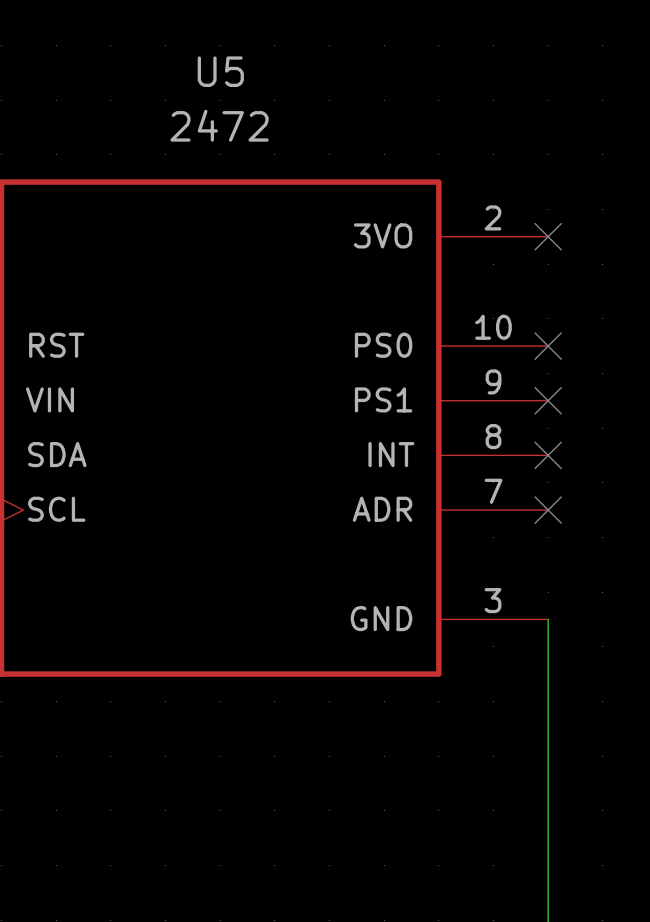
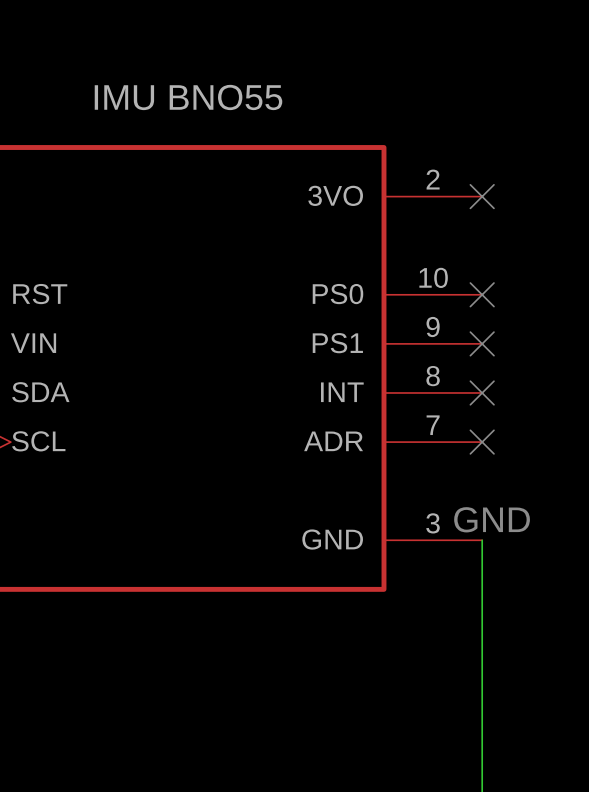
U5 name: U5 (220, 71) -> none
U5 value: 2472 (219, 125) -> IMU BNO55 (188, 97)
text: none -> GND (492, 519)

